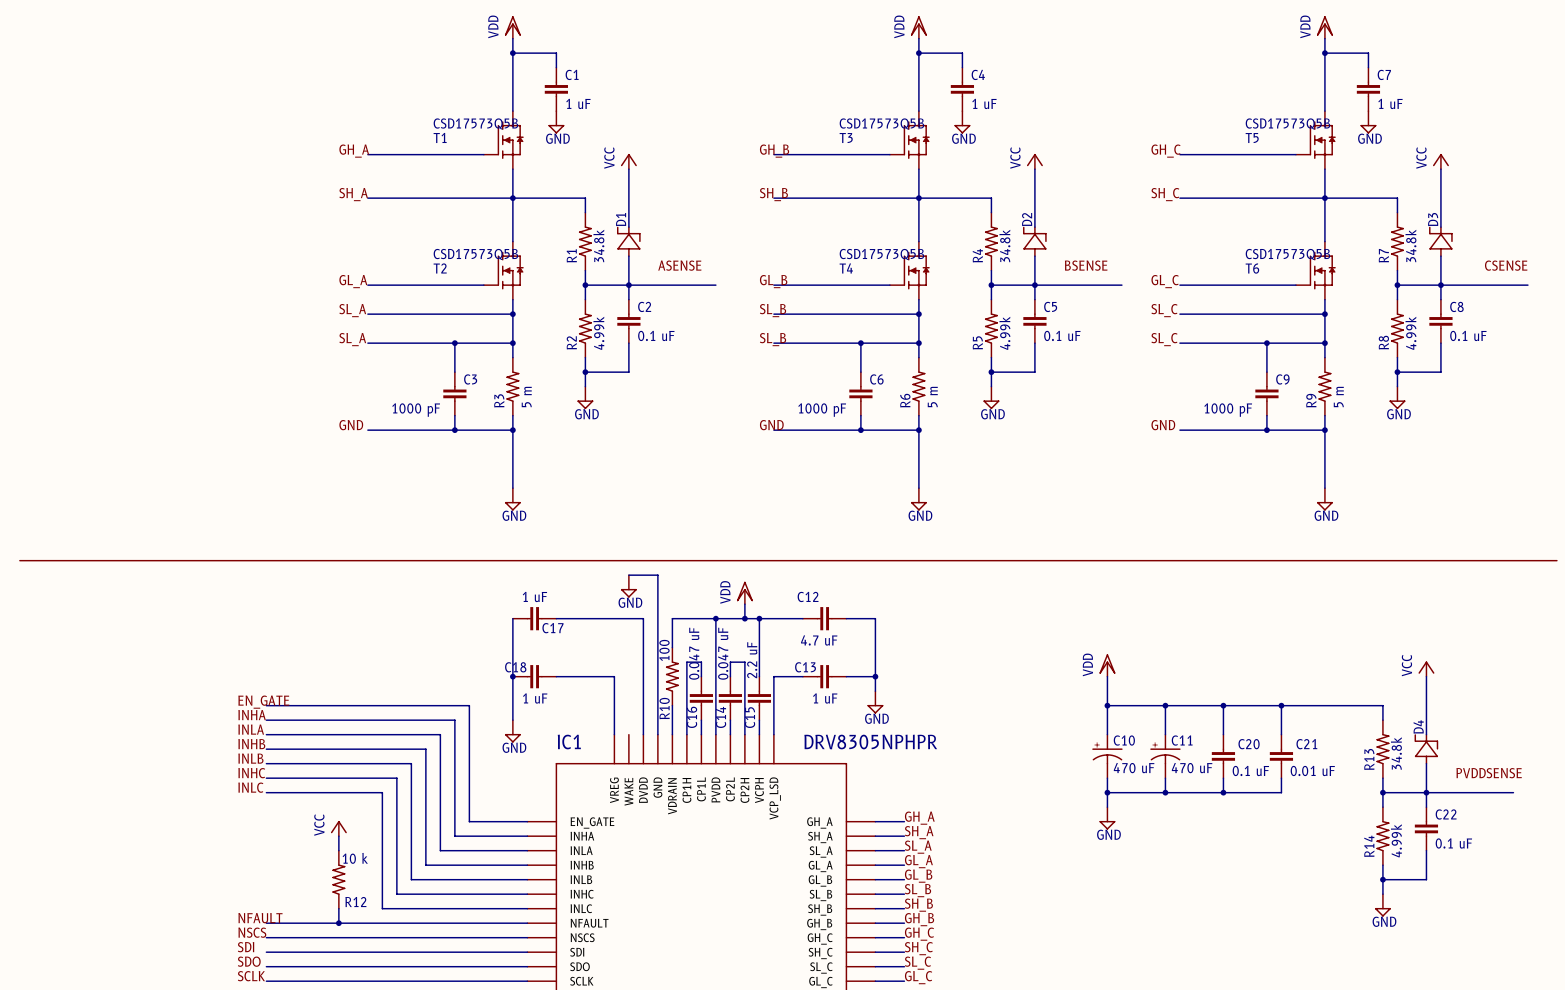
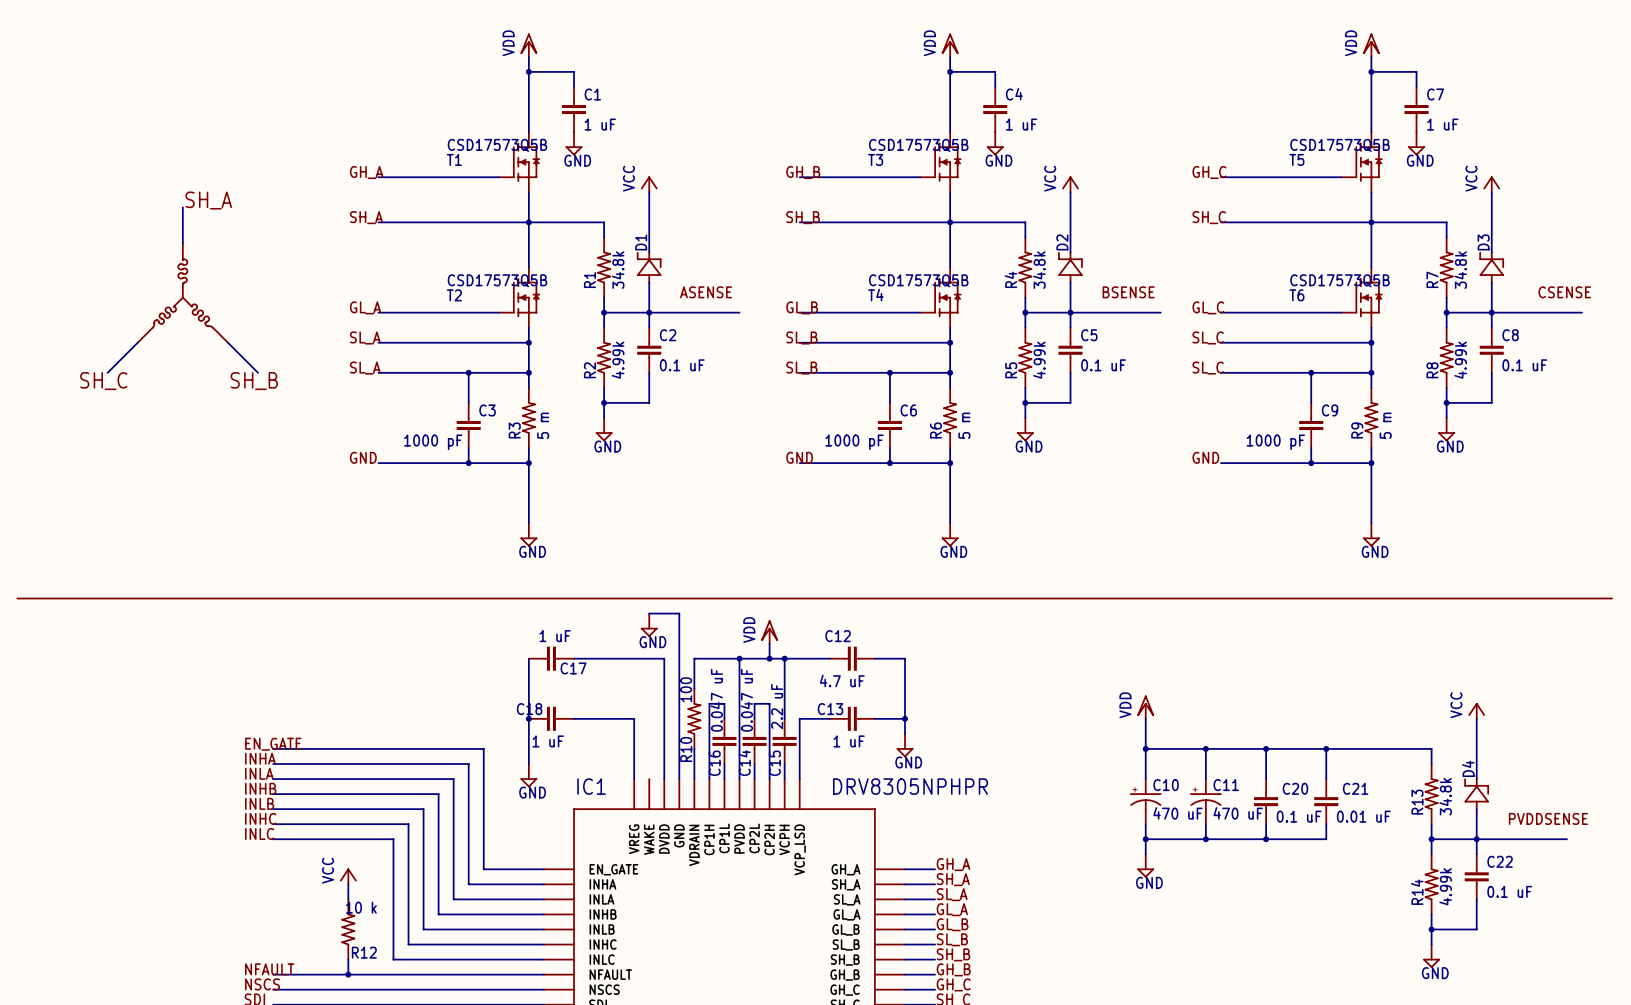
label: none -> SH_A (208, 200)
wire: none -> (182, 207) (182, 243)
part: none -> (182, 293)
wire: none -> (137, 342) (107, 372)
wire: none -> (227, 342) (258, 372)
label: none -> SH_C (103, 381)
label: none -> SH_B (254, 381)

